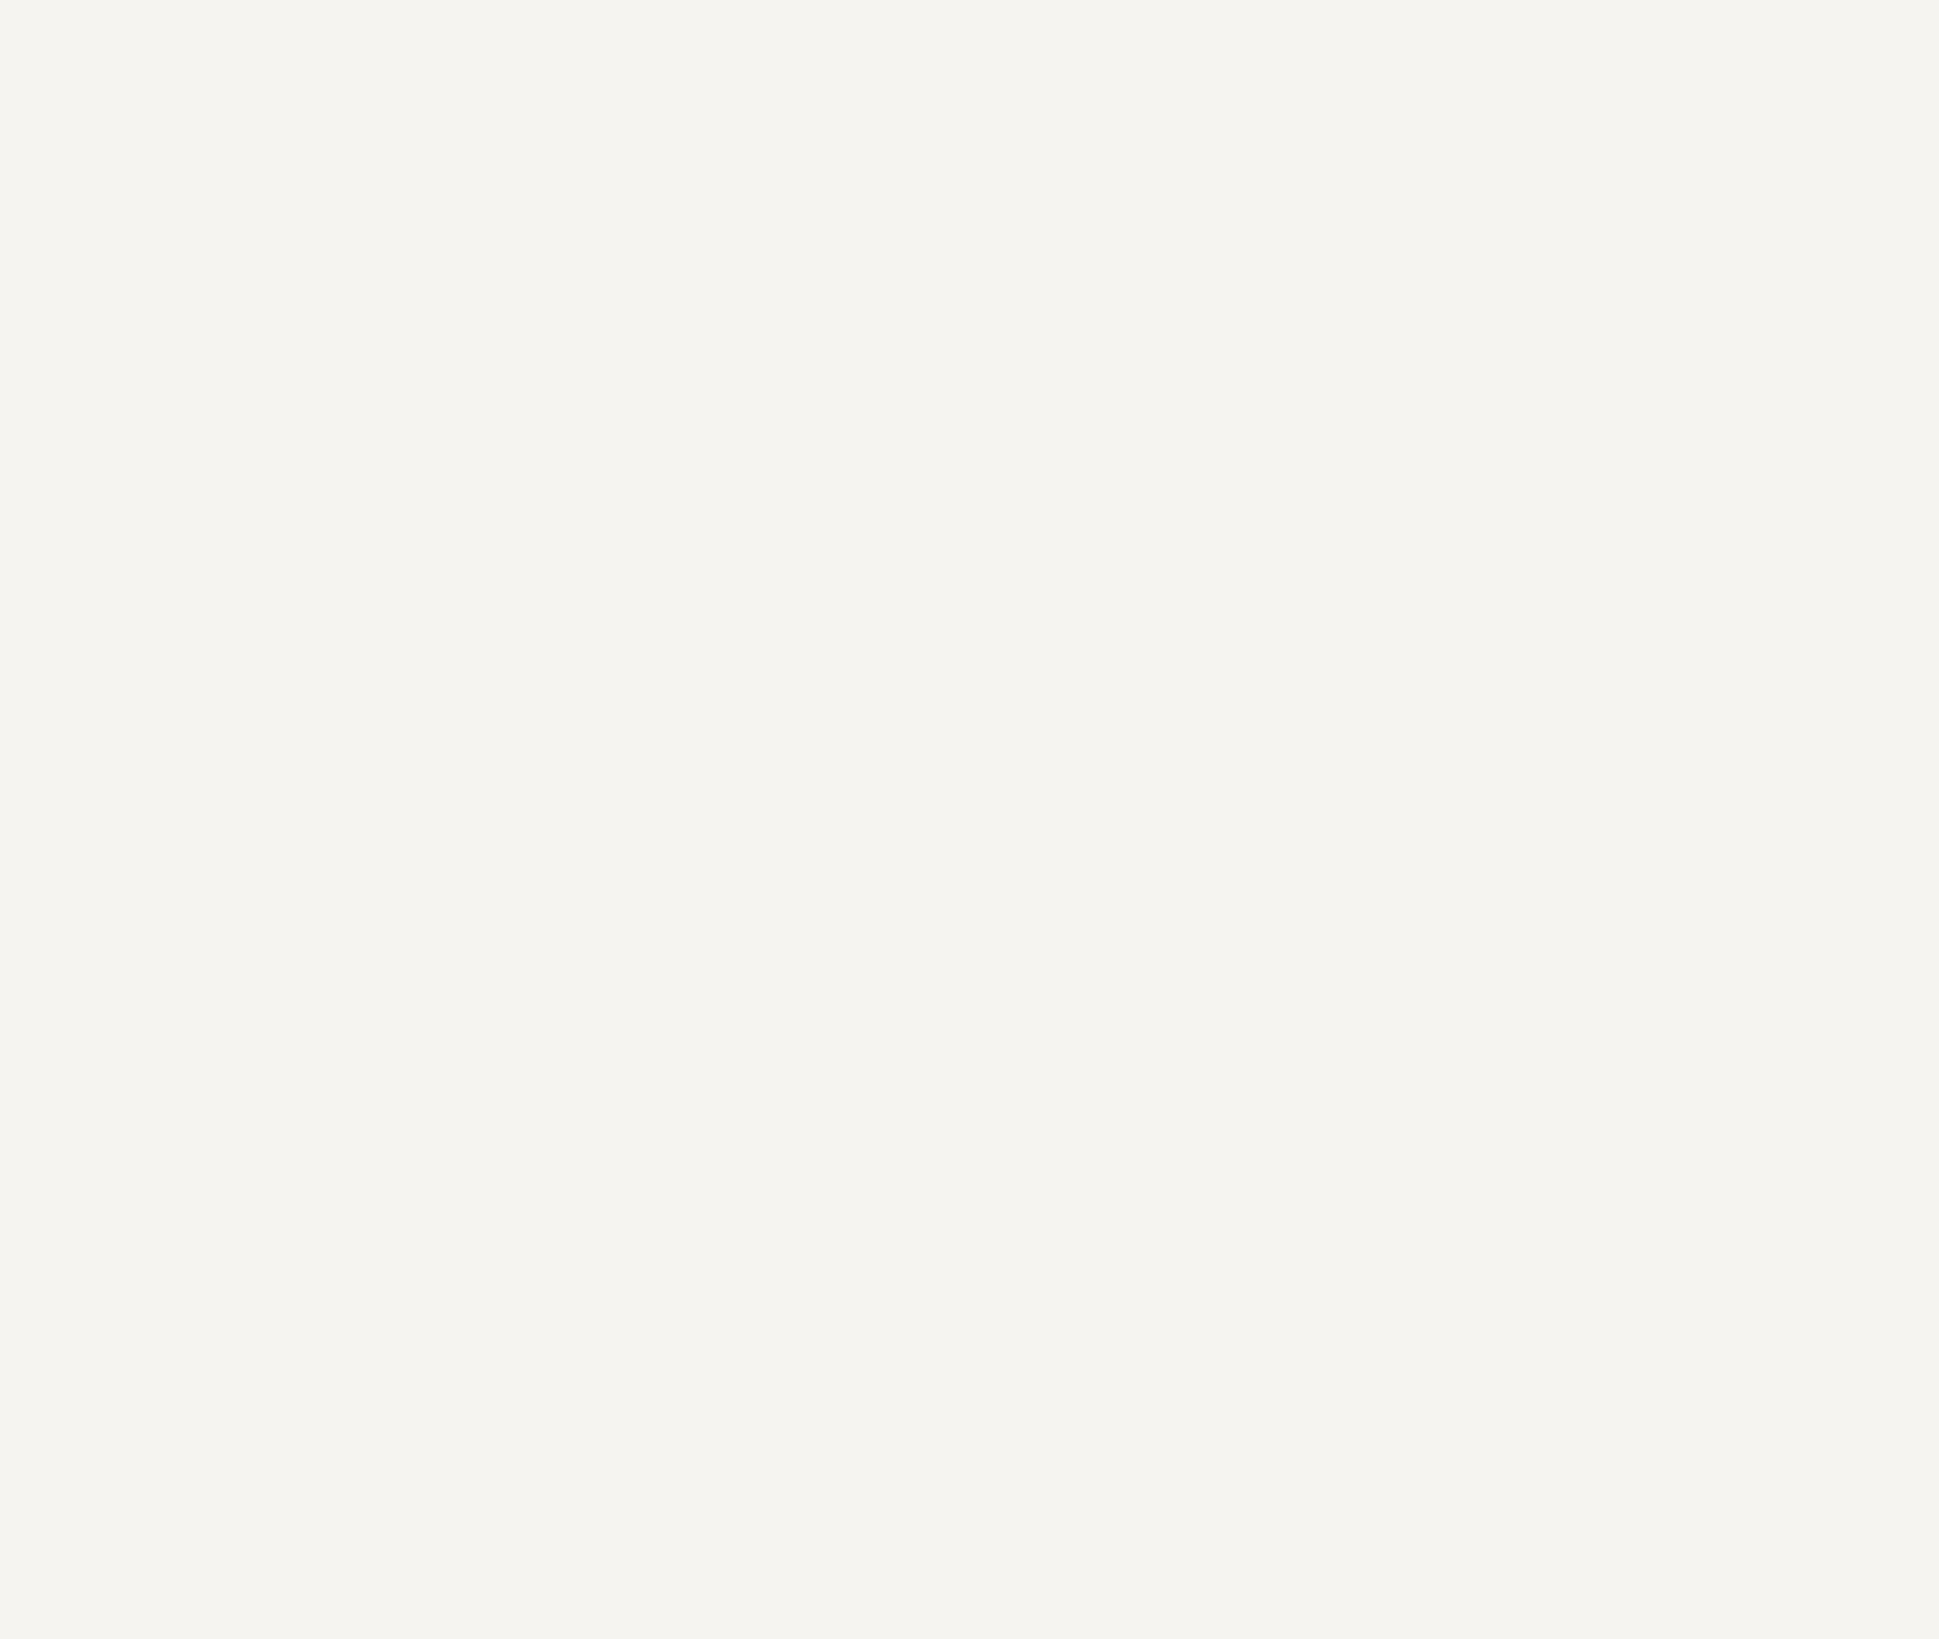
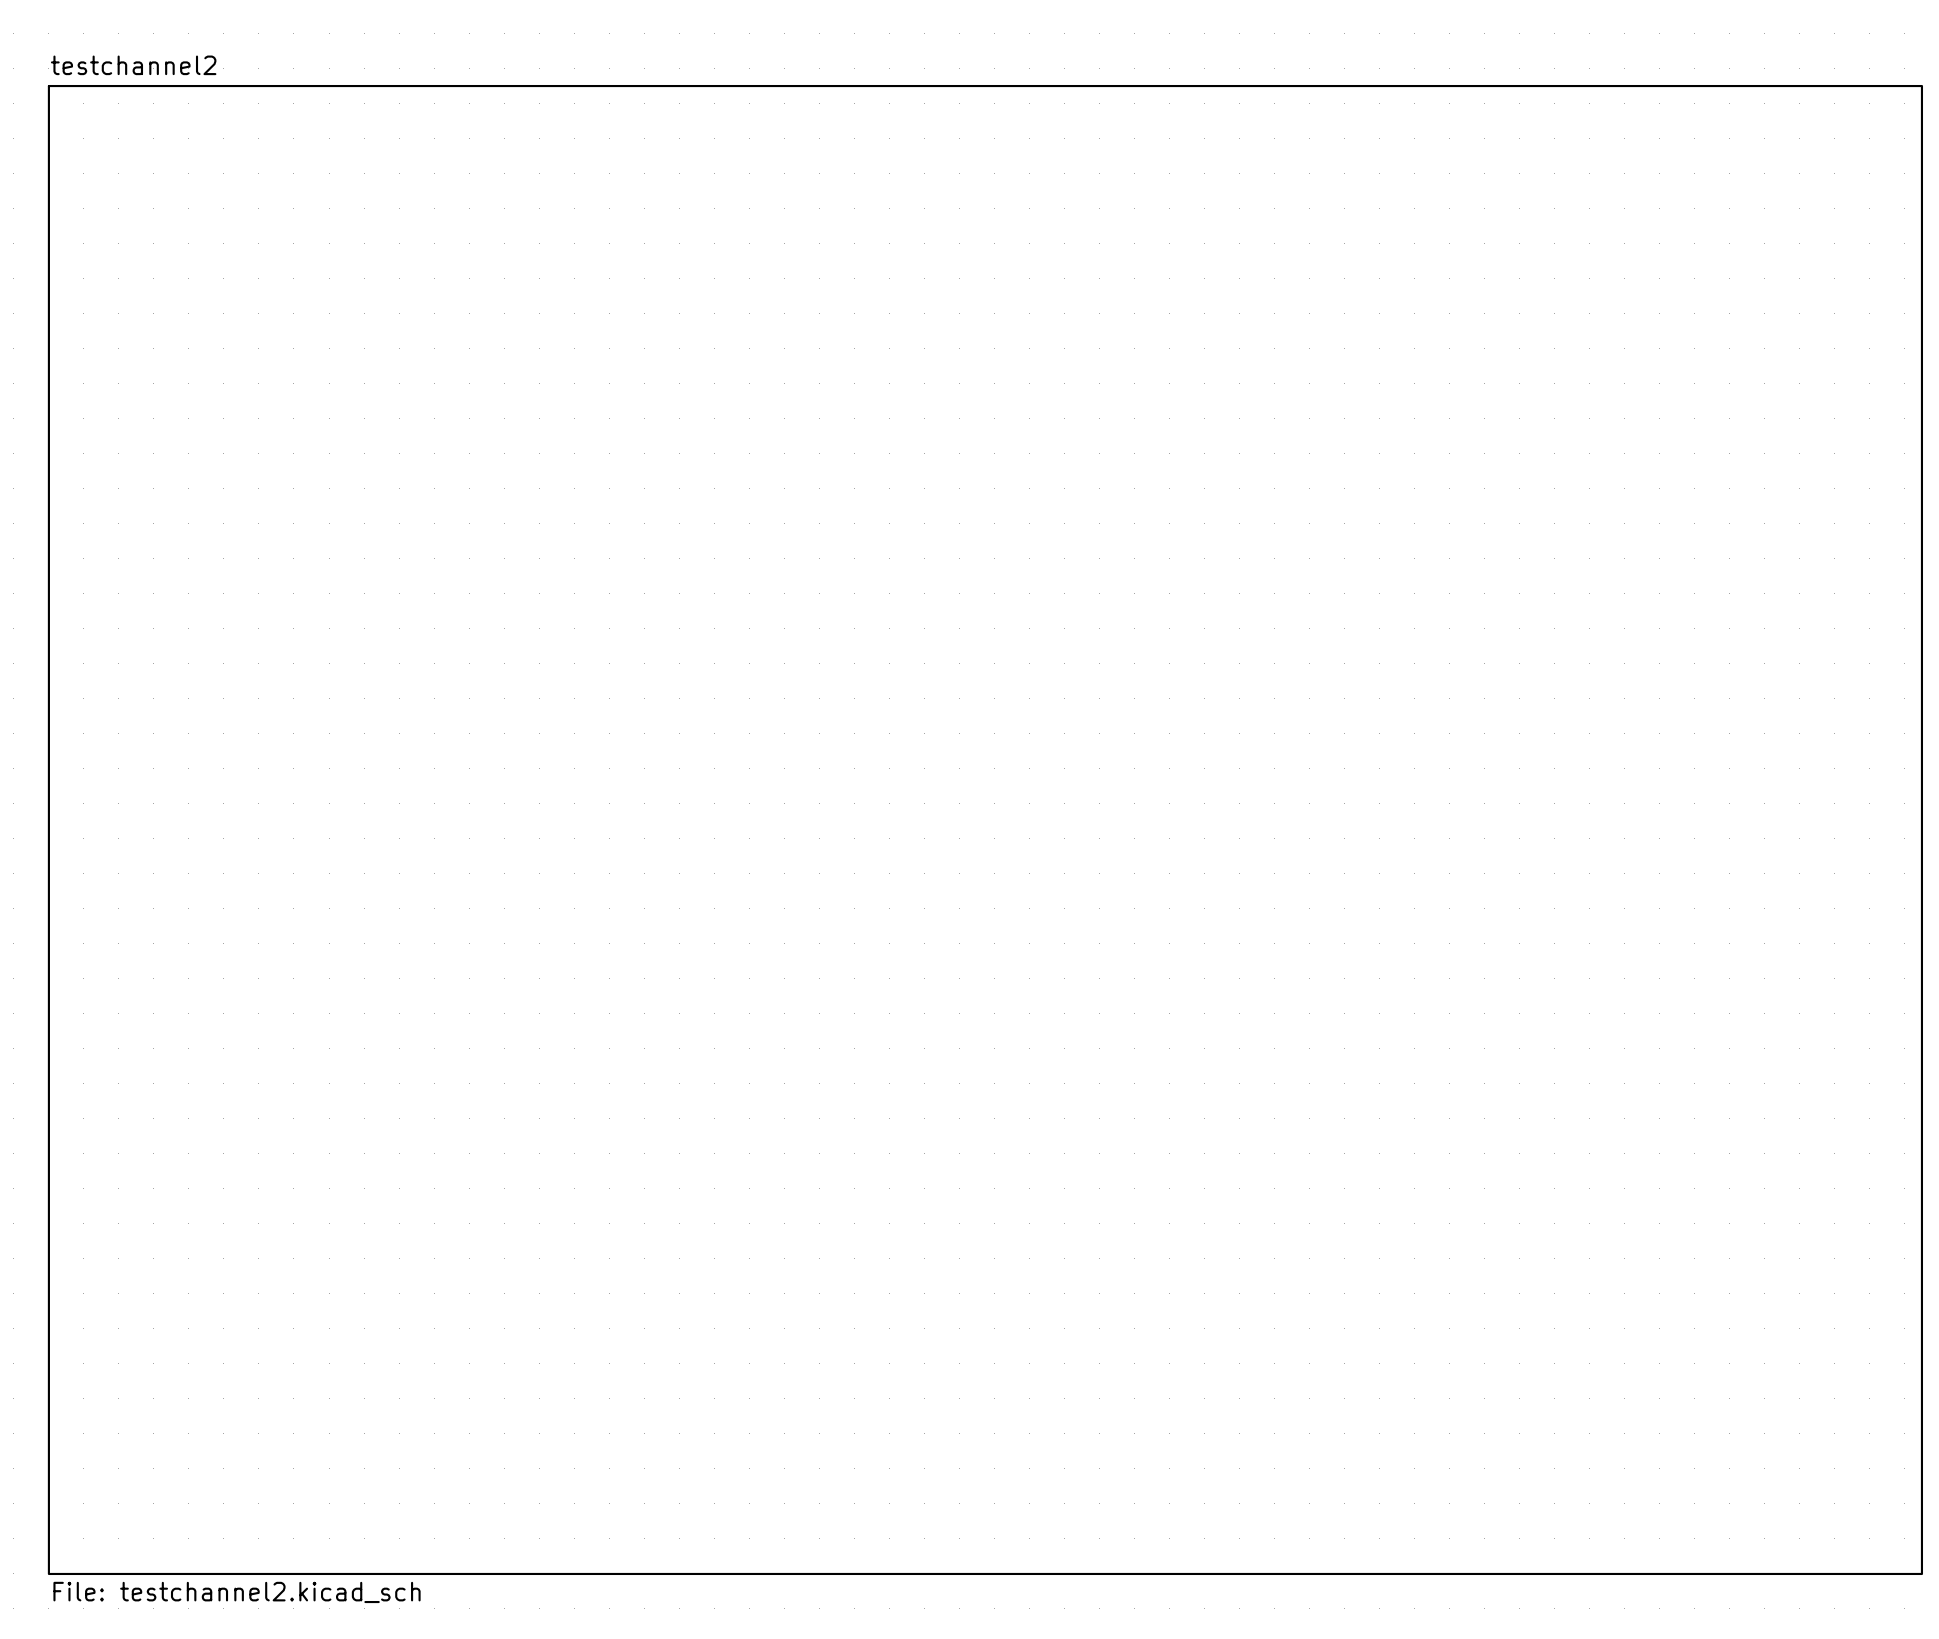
sheet testchannel2: none -> File: testchannel2.kicad_sch (985, 830)

